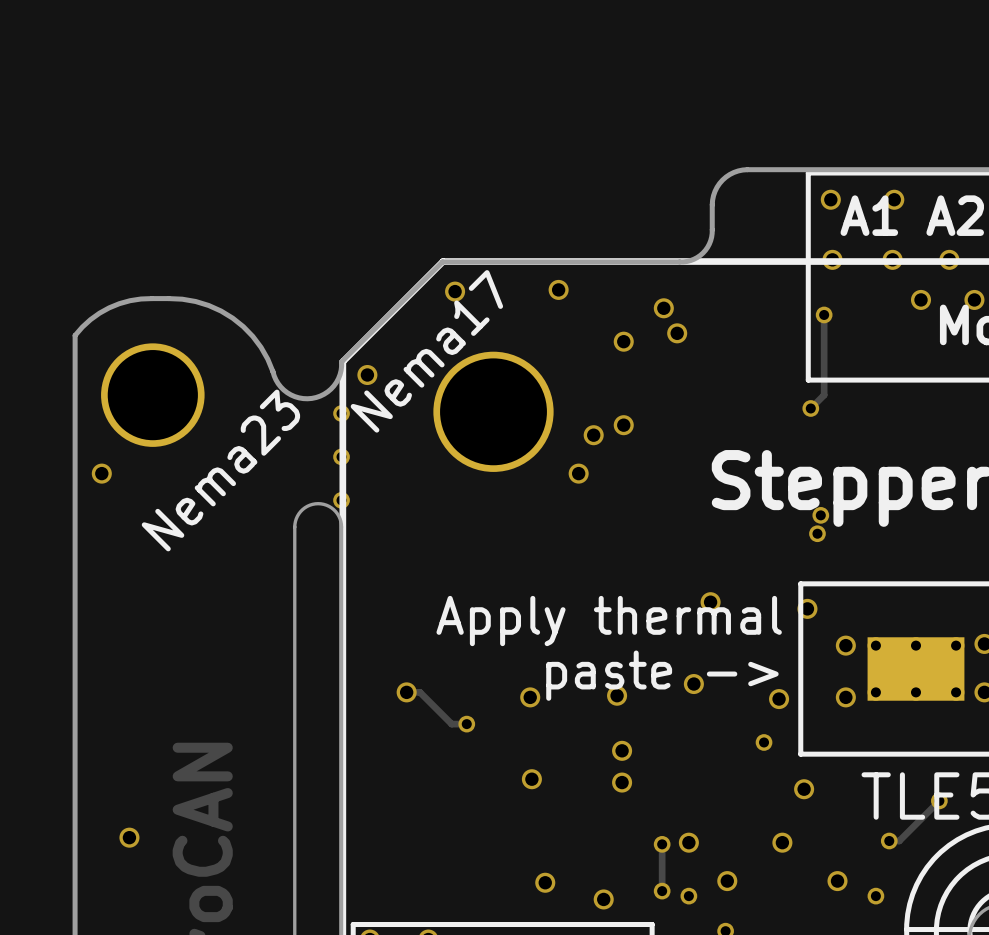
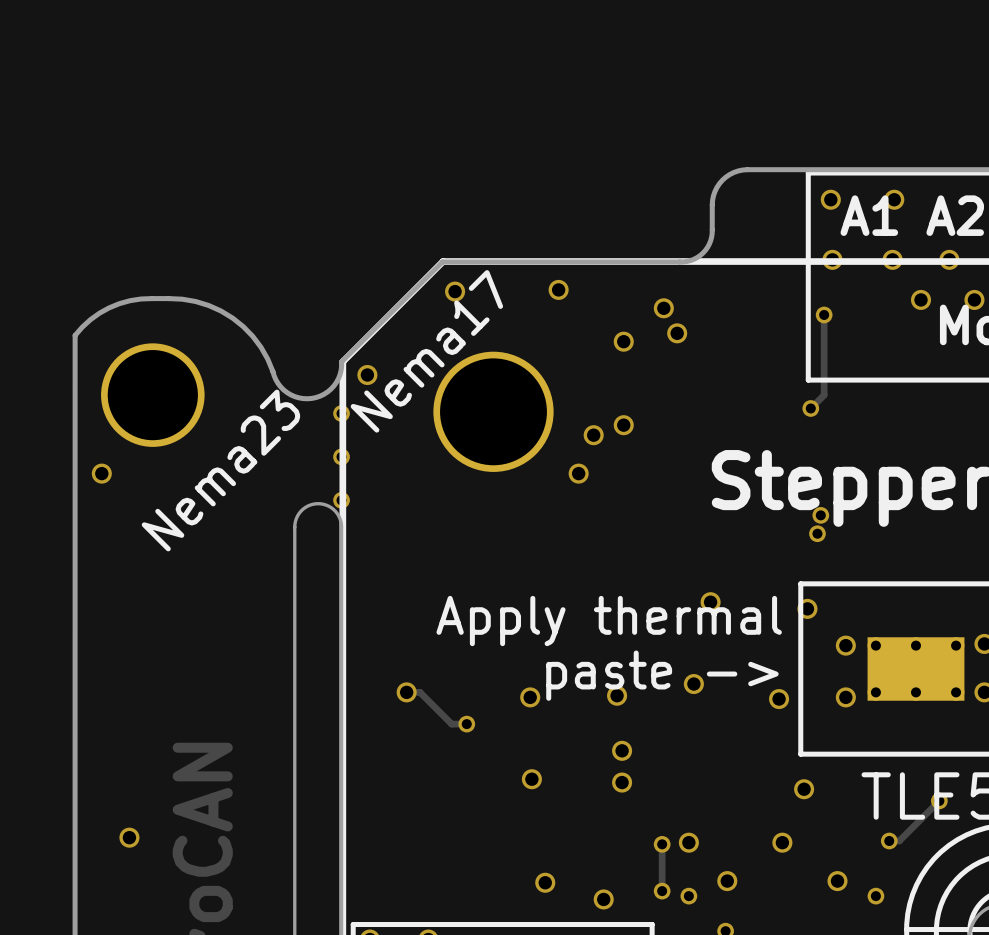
via: (764, 742) -> none

